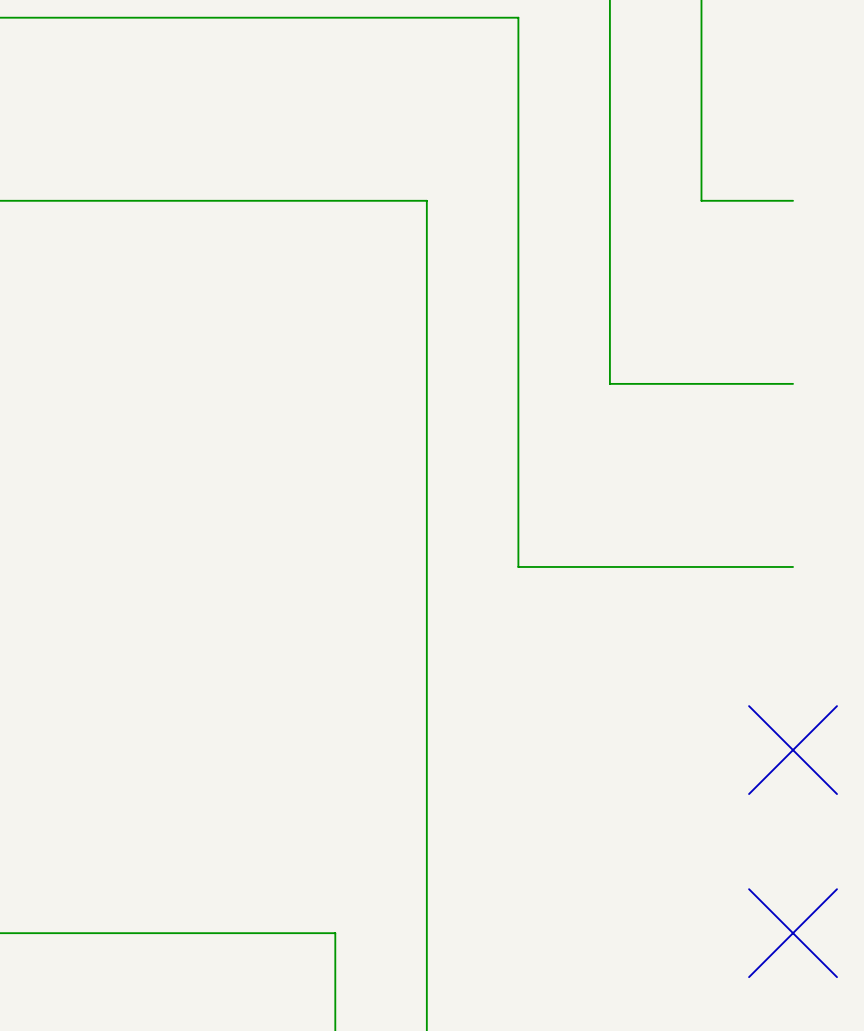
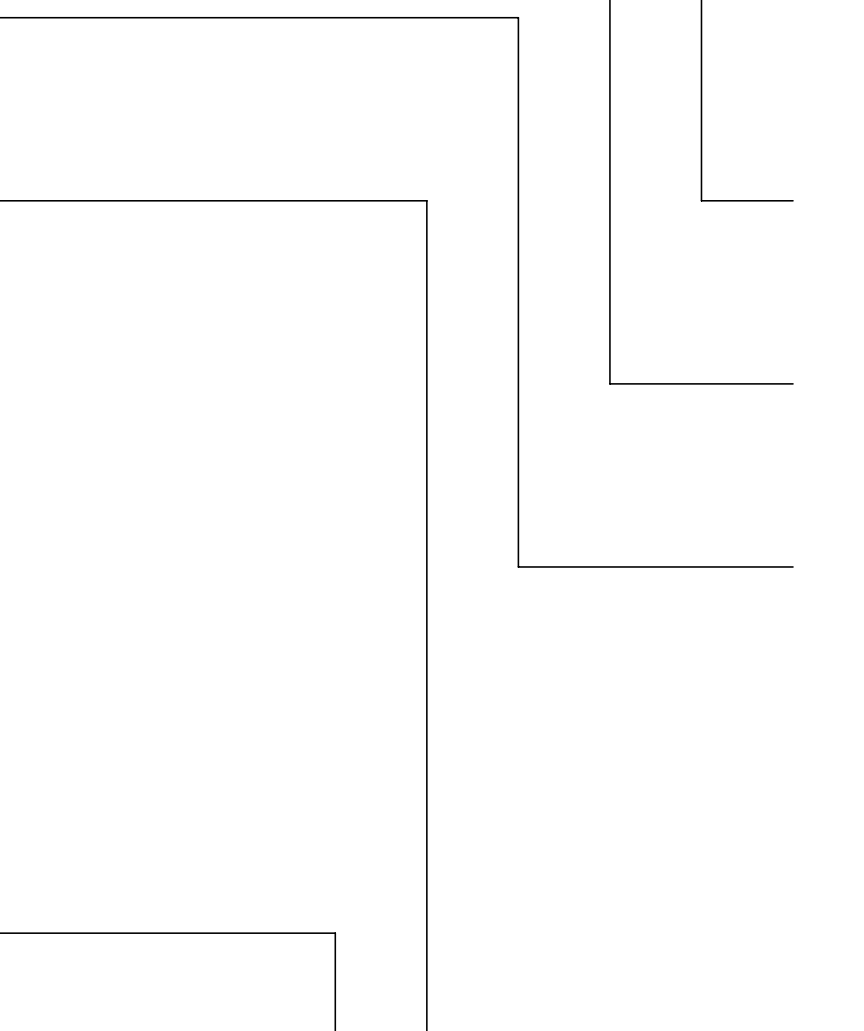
no-connect mark: (793, 750) -> none
no-connect mark: (793, 933) -> none

